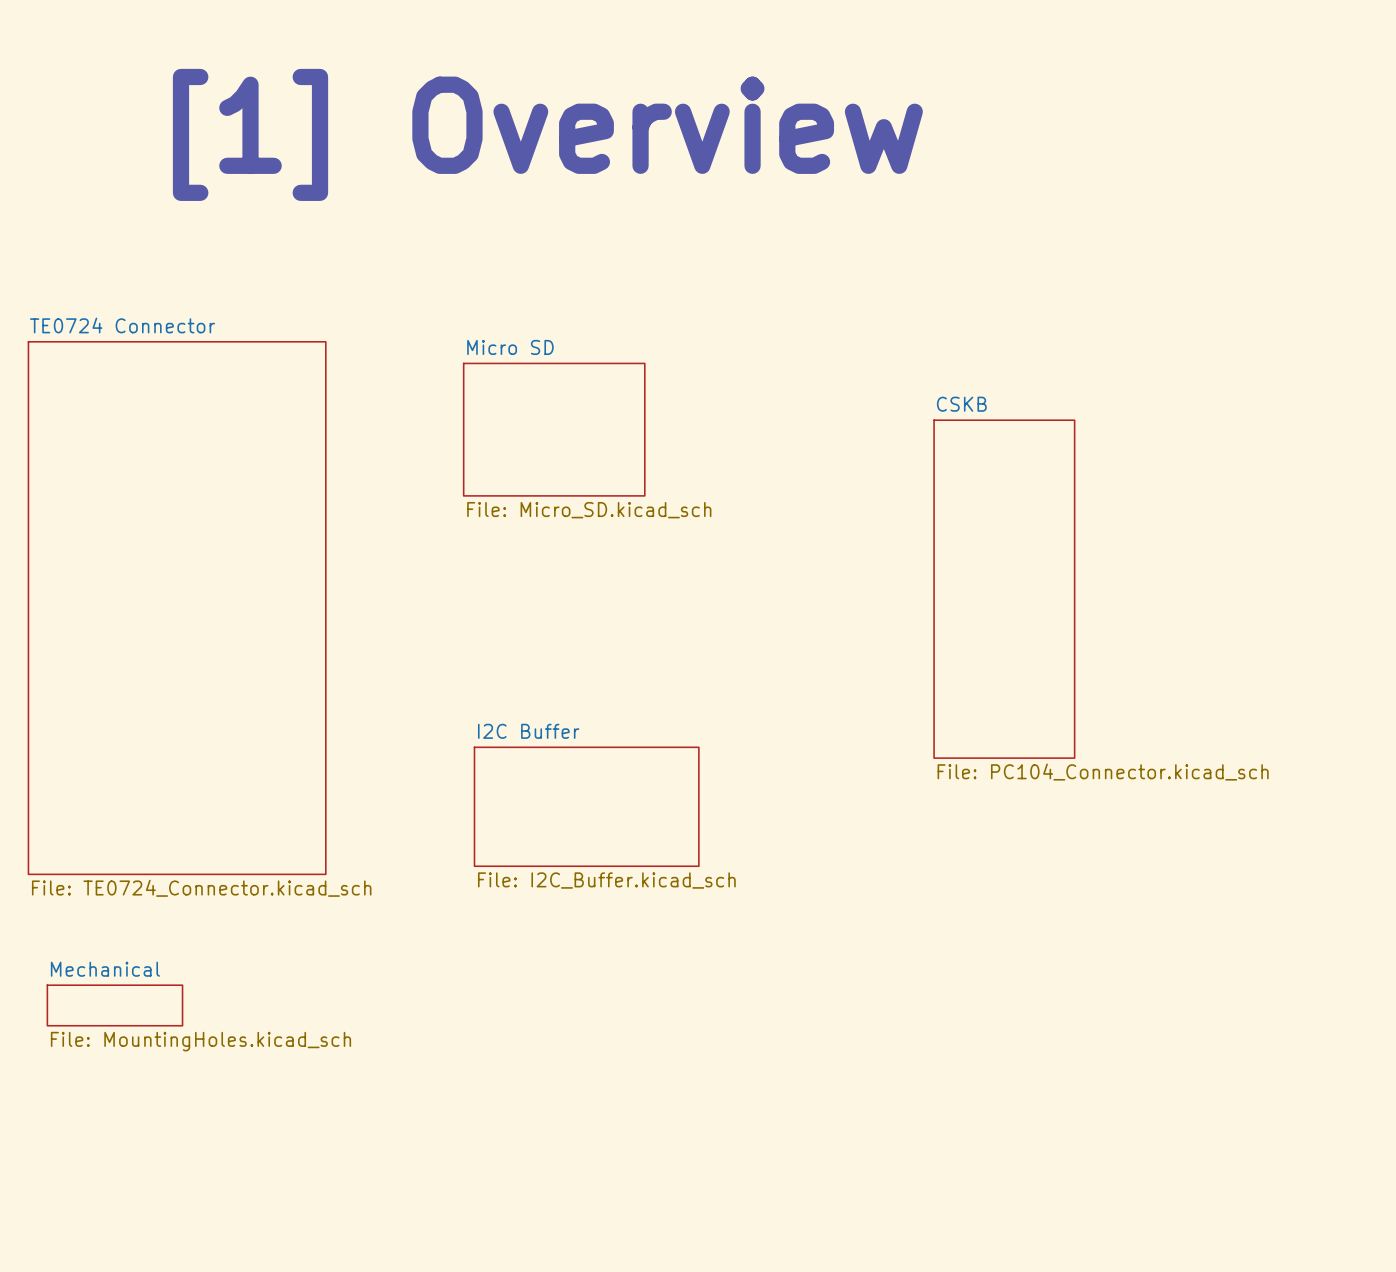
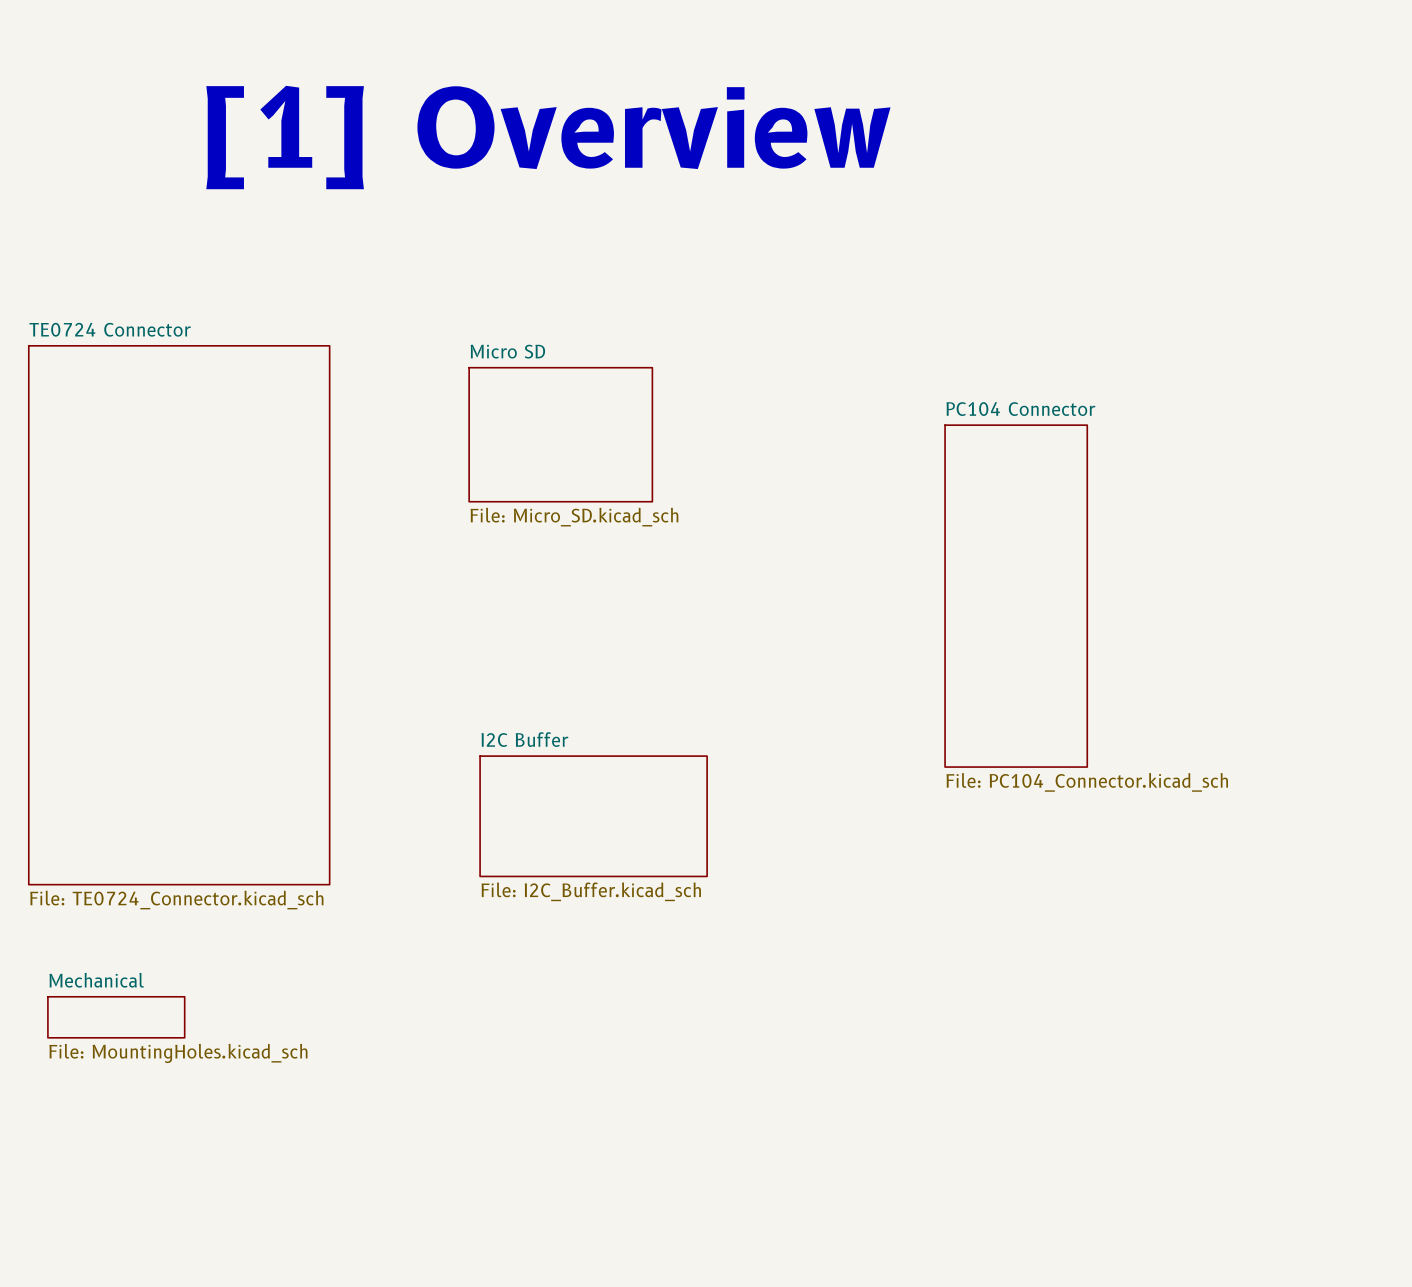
sheet CSKB name: CSKB (961, 404) -> PC104 Connector (1020, 409)

